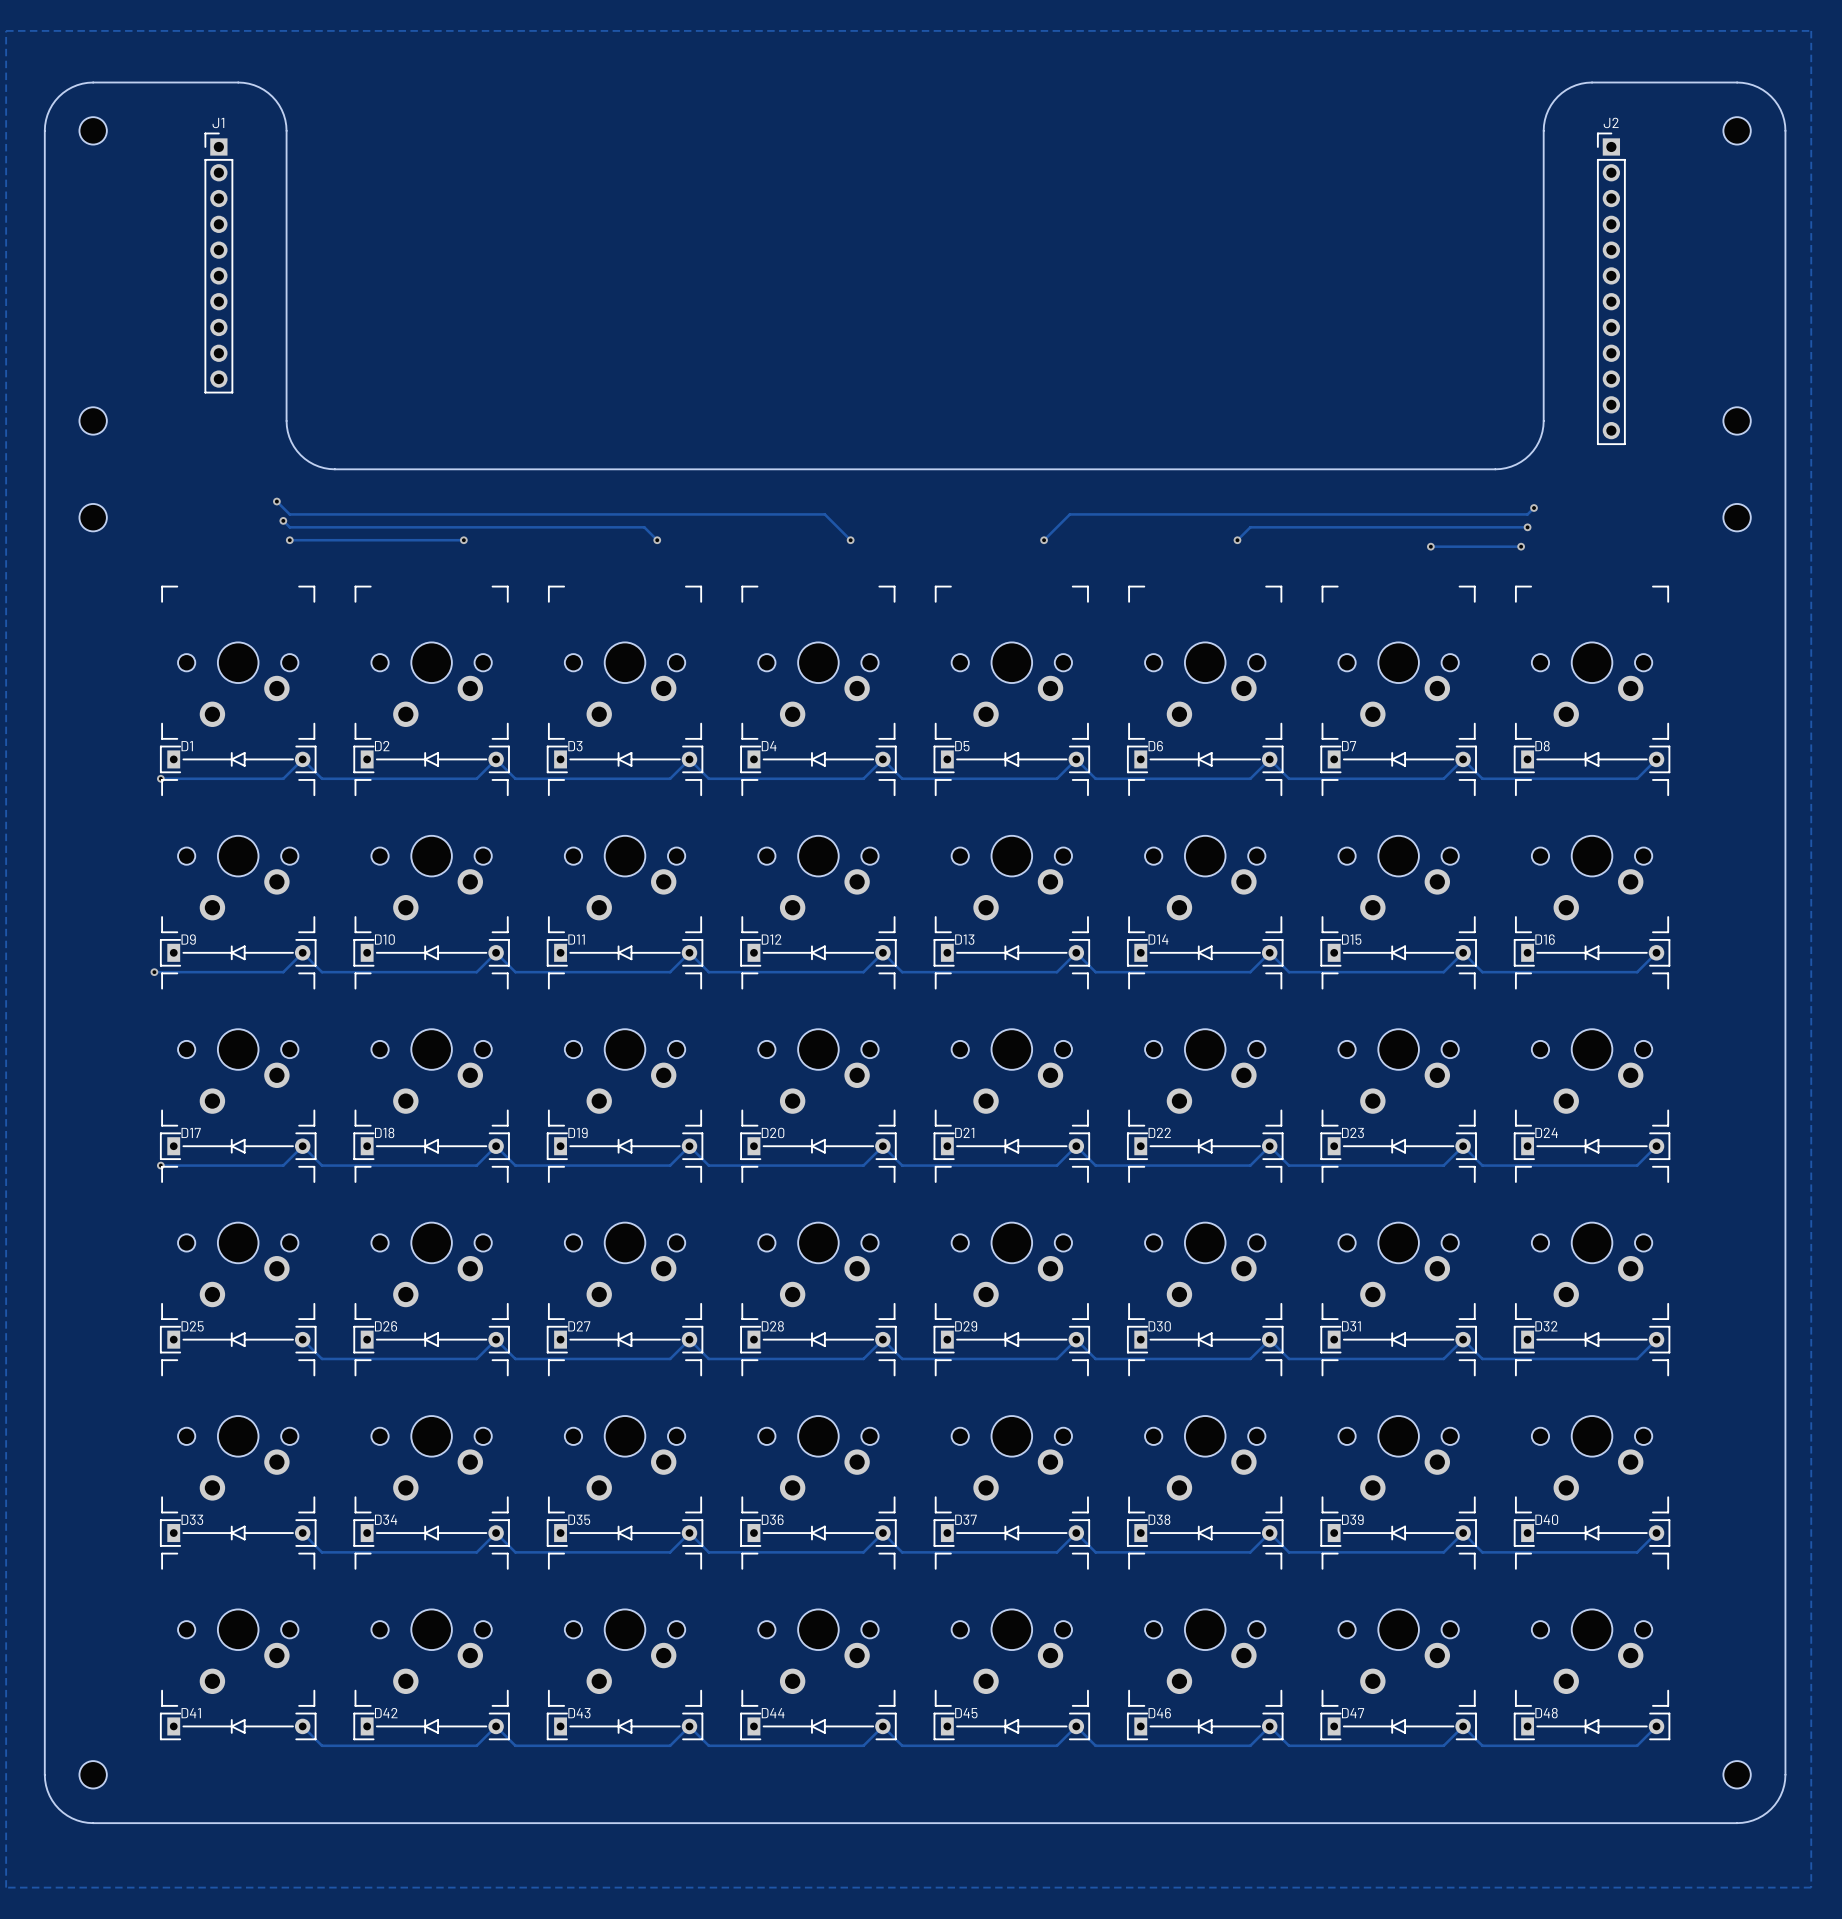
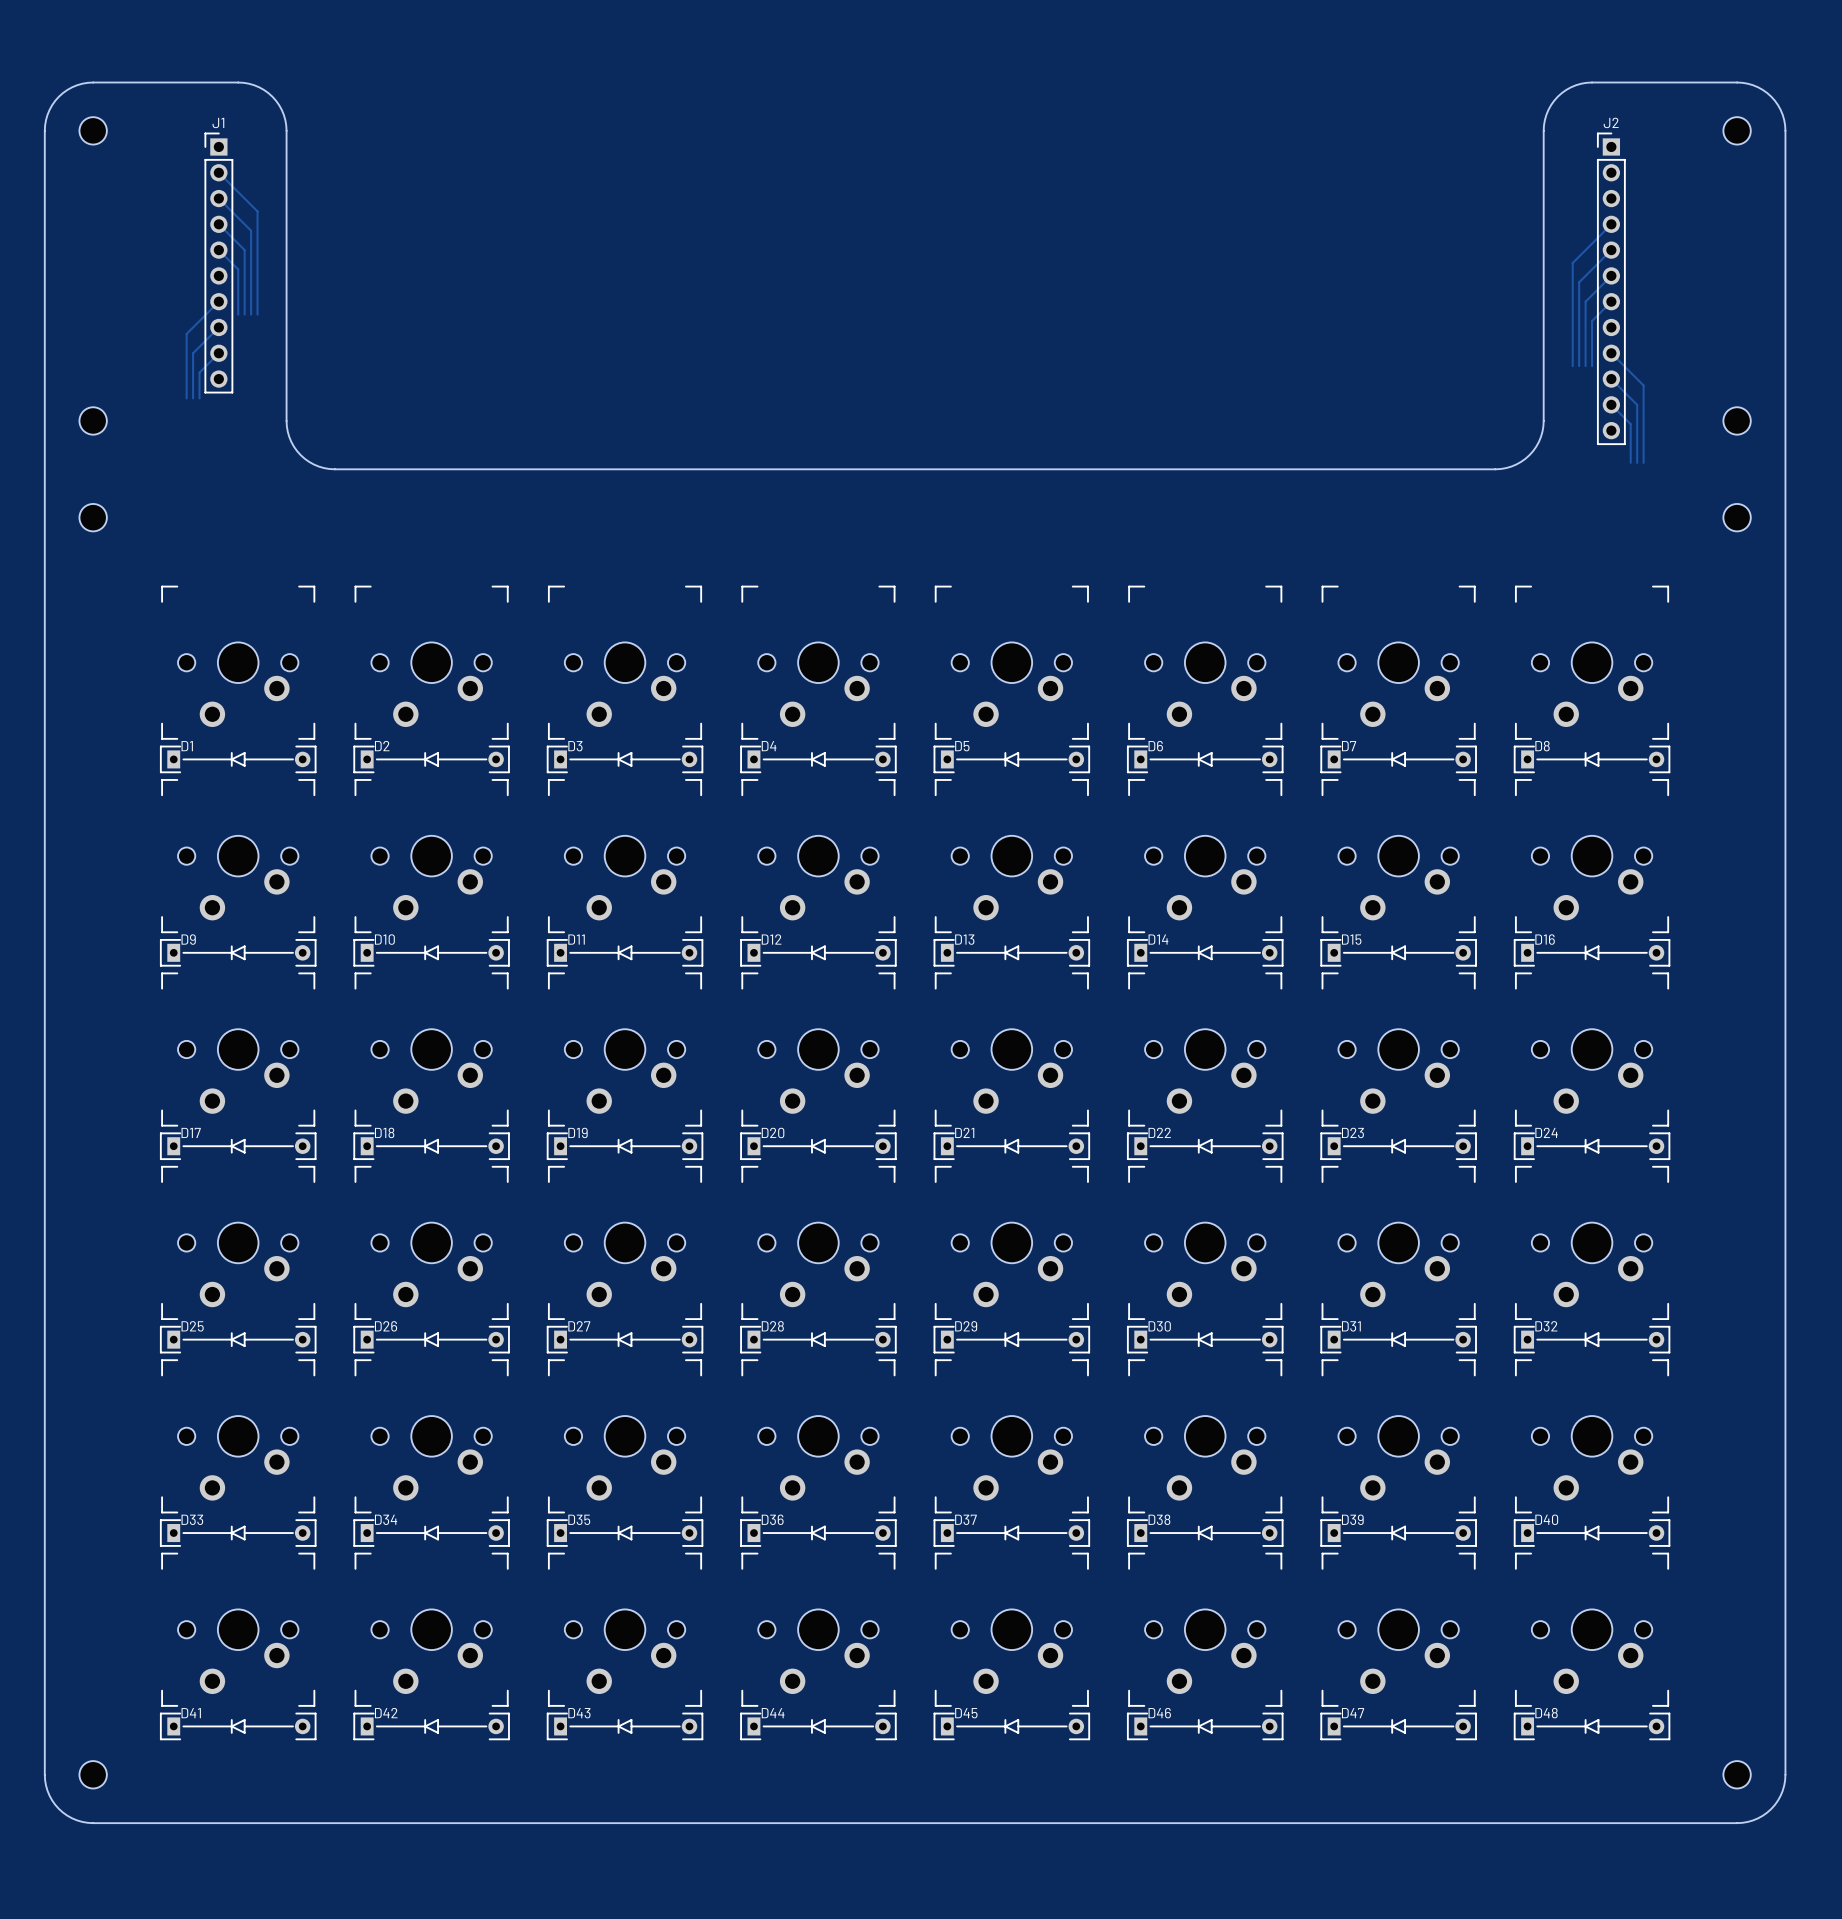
zone outline: (6, 30) (1811, 30) (1811, 1887) (6, 1887) (6, 30) -> none
track: none -> (218, 172) (257, 211) (257, 314)
track: none -> (218, 198) (251, 230) (251, 314)
track: none -> (218, 224) (244, 250) (244, 314)
track: none -> (1611, 224) (1572, 263) (1572, 366)
track: none -> (218, 250) (238, 269) (238, 314)
track: none -> (1611, 250) (1579, 282) (1579, 366)
track: none -> (1611, 275) (1585, 301) (1585, 366)
track: none -> (218, 301) (186, 333) (186, 398)
track: none -> (1611, 301) (1592, 321) (1592, 366)
track: none -> (218, 327) (193, 353) (193, 398)
track: none -> (218, 353) (199, 372) (199, 398)
track: none -> (1611, 353) (1643, 385) (1643, 462)
track: none -> (1611, 379) (1637, 404) (1637, 462)
track: none -> (1611, 404) (1630, 424) (1630, 462)
track: (276, 501) (289, 514) (824, 514) (850, 540) -> none
via: (276, 501) -> none
track: (1534, 507) (1527, 514) (1069, 514) (1044, 540) -> none
via: (1534, 507) -> none
track: (283, 520) (289, 527) (644, 527) (657, 540) -> none
via: (283, 520) -> none
track: (1527, 527) (1250, 527) (1237, 540) -> none
via: (1527, 527) -> none
track: (289, 540) (463, 540) -> none
via: (289, 540) -> none
via: (463, 540) -> none
via: (657, 540) -> none
via: (850, 540) -> none
via: (1044, 540) -> none
via: (1237, 540) -> none
track: (1430, 546) (1521, 546) -> none
via: (1430, 546) -> none
via: (1521, 546) -> none
track: (1656, 759) (1637, 778) (1482, 778) (1463, 759) (1443, 778) (1289, 778) (1269, 759) (1250, 778) (1095, 778) (1076, 759) (1056, 778) (902, 778) (882, 759) (863, 778) (708, 778) (689, 759) (670, 778) (515, 778) (496, 759) (476, 778) (322, 778) (302, 759) (283, 778) (160, 778) -> none
via: (160, 778) -> none
track: (1656, 952) (1637, 972) (1482, 972) (1463, 952) (1443, 972) (1289, 972) (1269, 952) (1250, 972) (1095, 972) (1076, 952) (1056, 972) (902, 972) (882, 952) (863, 972) (708, 972) (689, 952) (670, 972) (515, 972) (496, 952) (476, 972) (322, 972) (302, 952) (283, 972) (154, 972) -> none
via: (154, 972) -> none
track: (1656, 1146) (1637, 1165) (1482, 1165) (1463, 1146) (1443, 1165) (1289, 1165) (1269, 1146) (1250, 1165) (1095, 1165) (1076, 1146) (1056, 1165) (902, 1165) (882, 1146) (863, 1165) (708, 1165) (689, 1146) (670, 1165) (515, 1165) (496, 1146) (476, 1165) (322, 1165) (302, 1146) (283, 1165) (160, 1165) -> none
via: (160, 1165) -> none
track: (302, 1339) (322, 1358) (476, 1358) (496, 1339) (515, 1358) (670, 1358) (689, 1339) (708, 1358) (863, 1358) (882, 1339) (902, 1358) (1056, 1358) (1076, 1339) (1095, 1358) (1250, 1358) (1269, 1339) (1289, 1358) (1443, 1358) (1463, 1339) (1482, 1358) (1637, 1358) (1656, 1339) -> none
track: (302, 1533) (322, 1552) (476, 1552) (496, 1533) (515, 1552) (670, 1552) (689, 1533) (708, 1552) (863, 1552) (882, 1533) (902, 1552) (1056, 1552) (1076, 1533) (1095, 1552) (1250, 1552) (1269, 1533) (1289, 1552) (1443, 1552) (1463, 1533) (1482, 1552) (1637, 1552) (1656, 1533) -> none
track: (302, 1726) (322, 1745) (476, 1745) (496, 1726) (515, 1745) (670, 1745) (689, 1726) (708, 1745) (863, 1745) (882, 1726) (902, 1745) (1056, 1745) (1076, 1726) (1095, 1745) (1250, 1745) (1269, 1726) (1289, 1745) (1443, 1745) (1463, 1726) (1482, 1745) (1637, 1745) (1656, 1726) -> none

